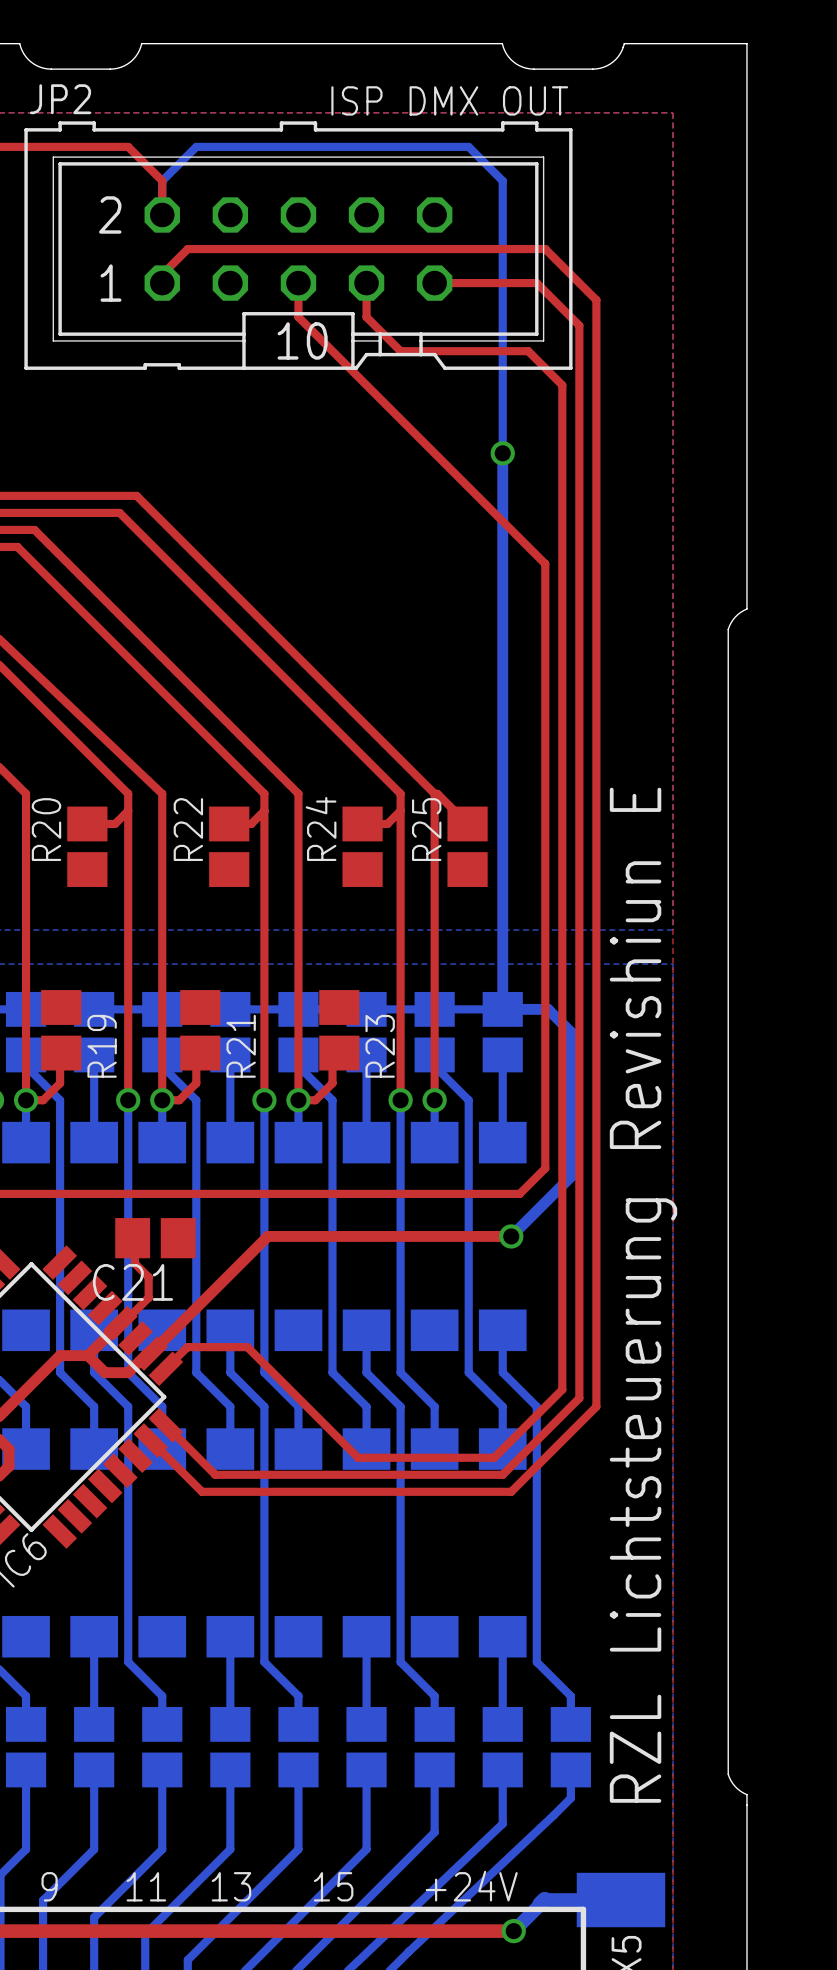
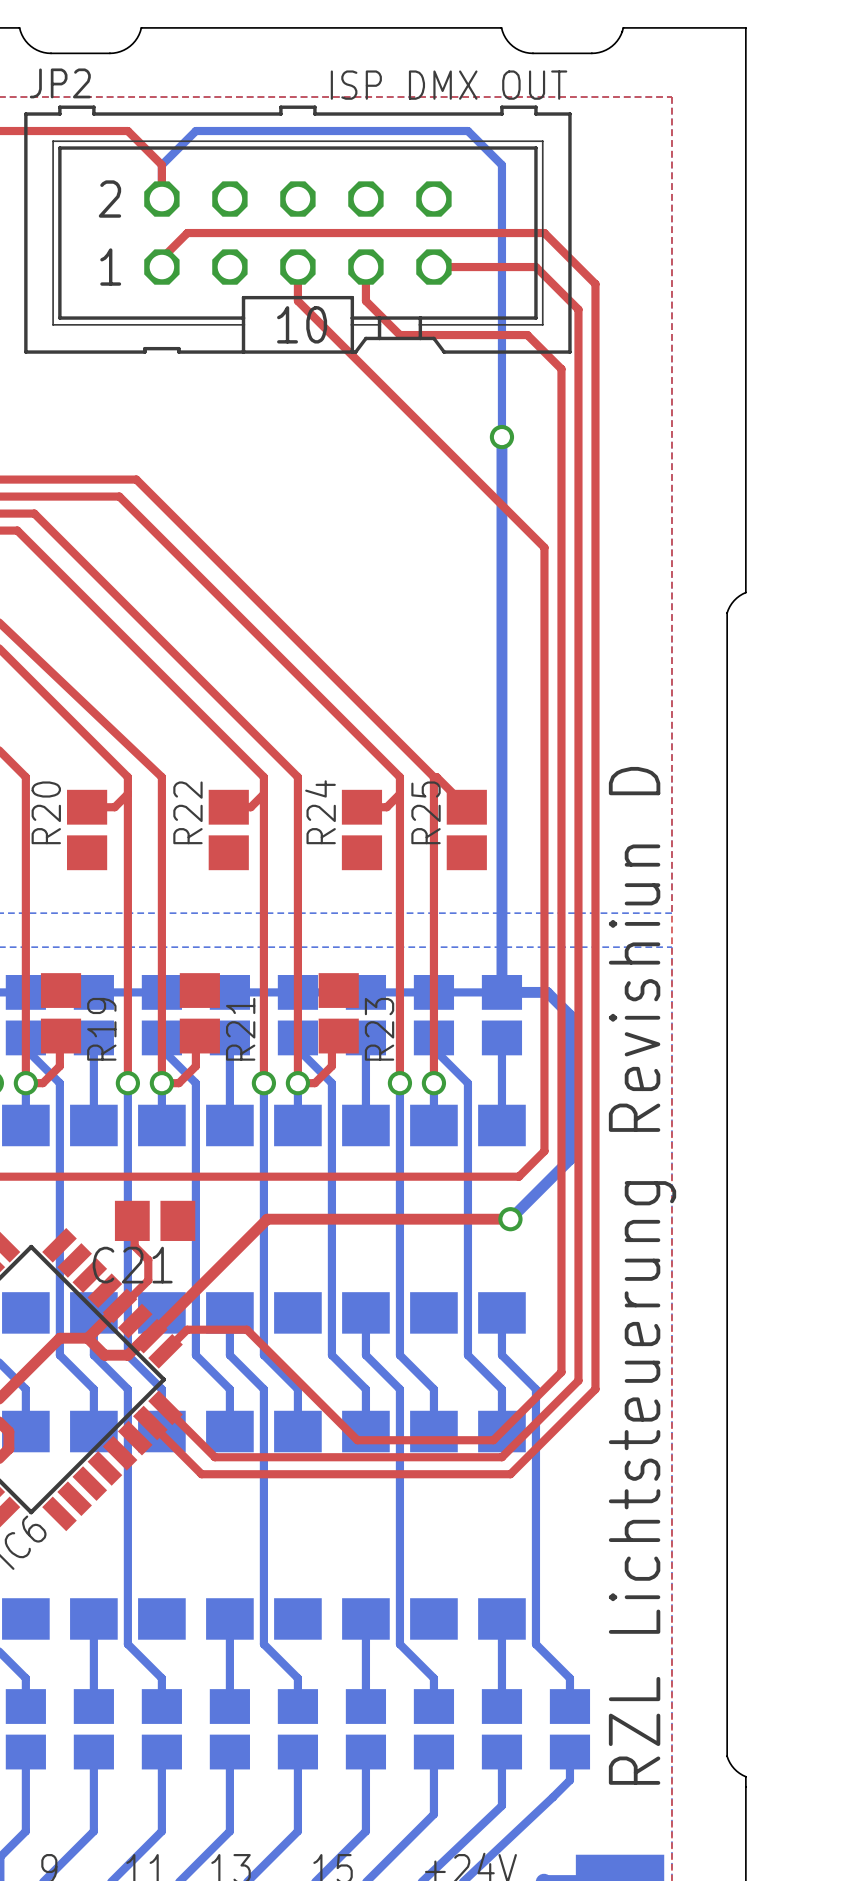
text: RZL Lichtsteuerung Revishiun E (643, 1295) -> RZL Lichtsteuerung Revishiun D (642, 1275)

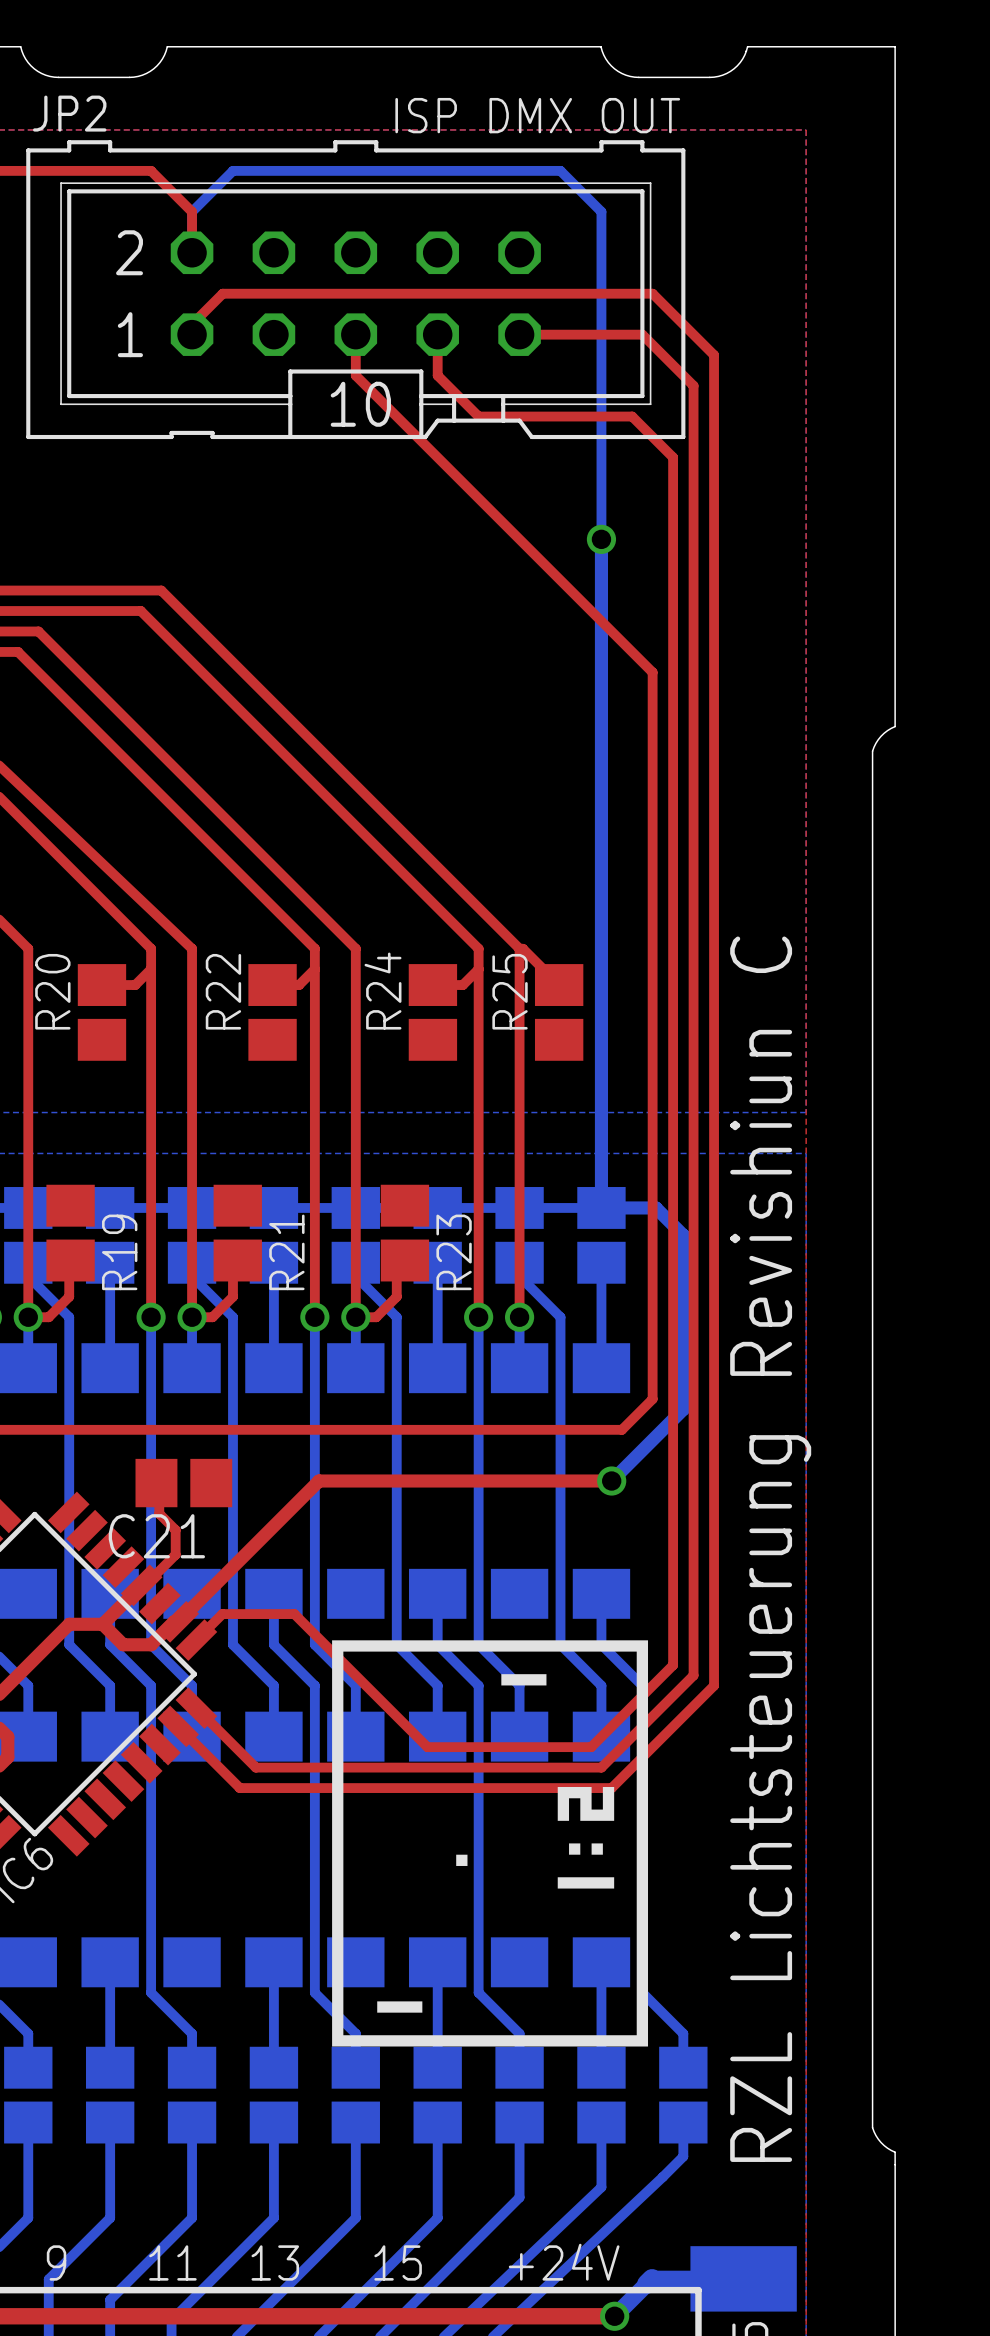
text: RZL Lichtsteuerung Revishiun D (642, 1275) -> RZL Lichtsteuerung Revishiun C (770, 1549)
drawing: none -> [332, 1640, 649, 2047]
drawing: none -> [456, 1854, 468, 1866]

